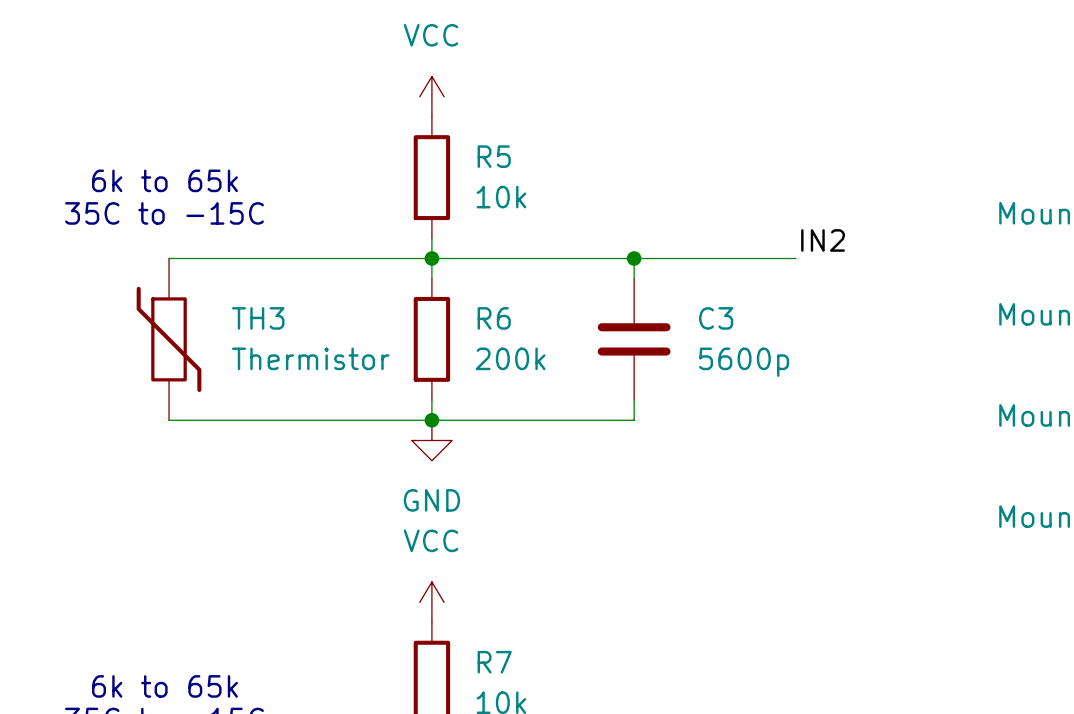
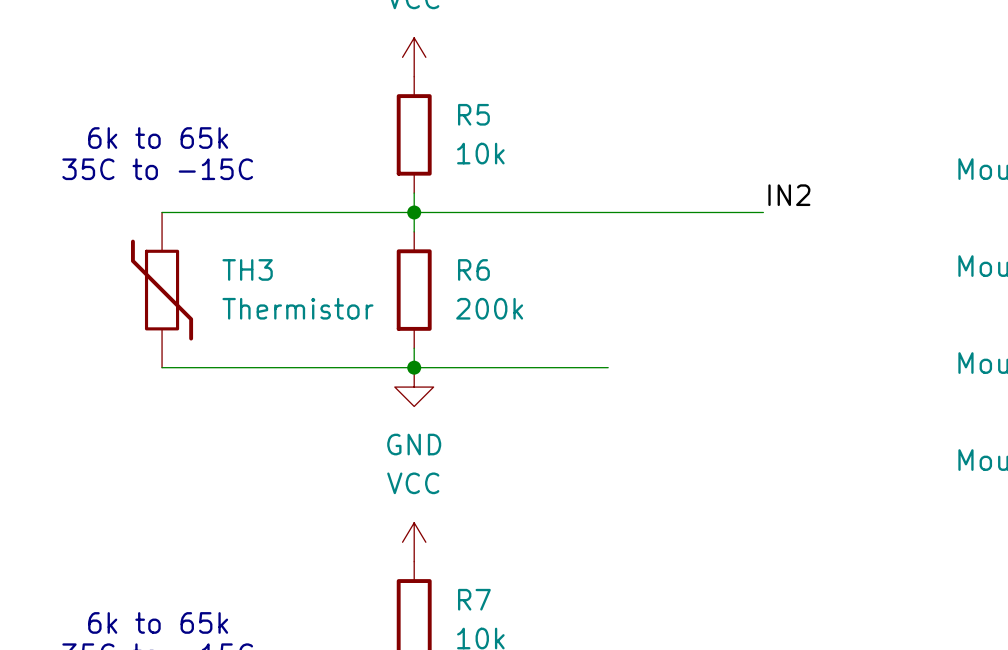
wire: (634, 258) (634, 278) -> none
junction: (634, 258) -> none
C3: 5600p (634, 339) -> none
wire: (634, 400) (634, 420) -> none

